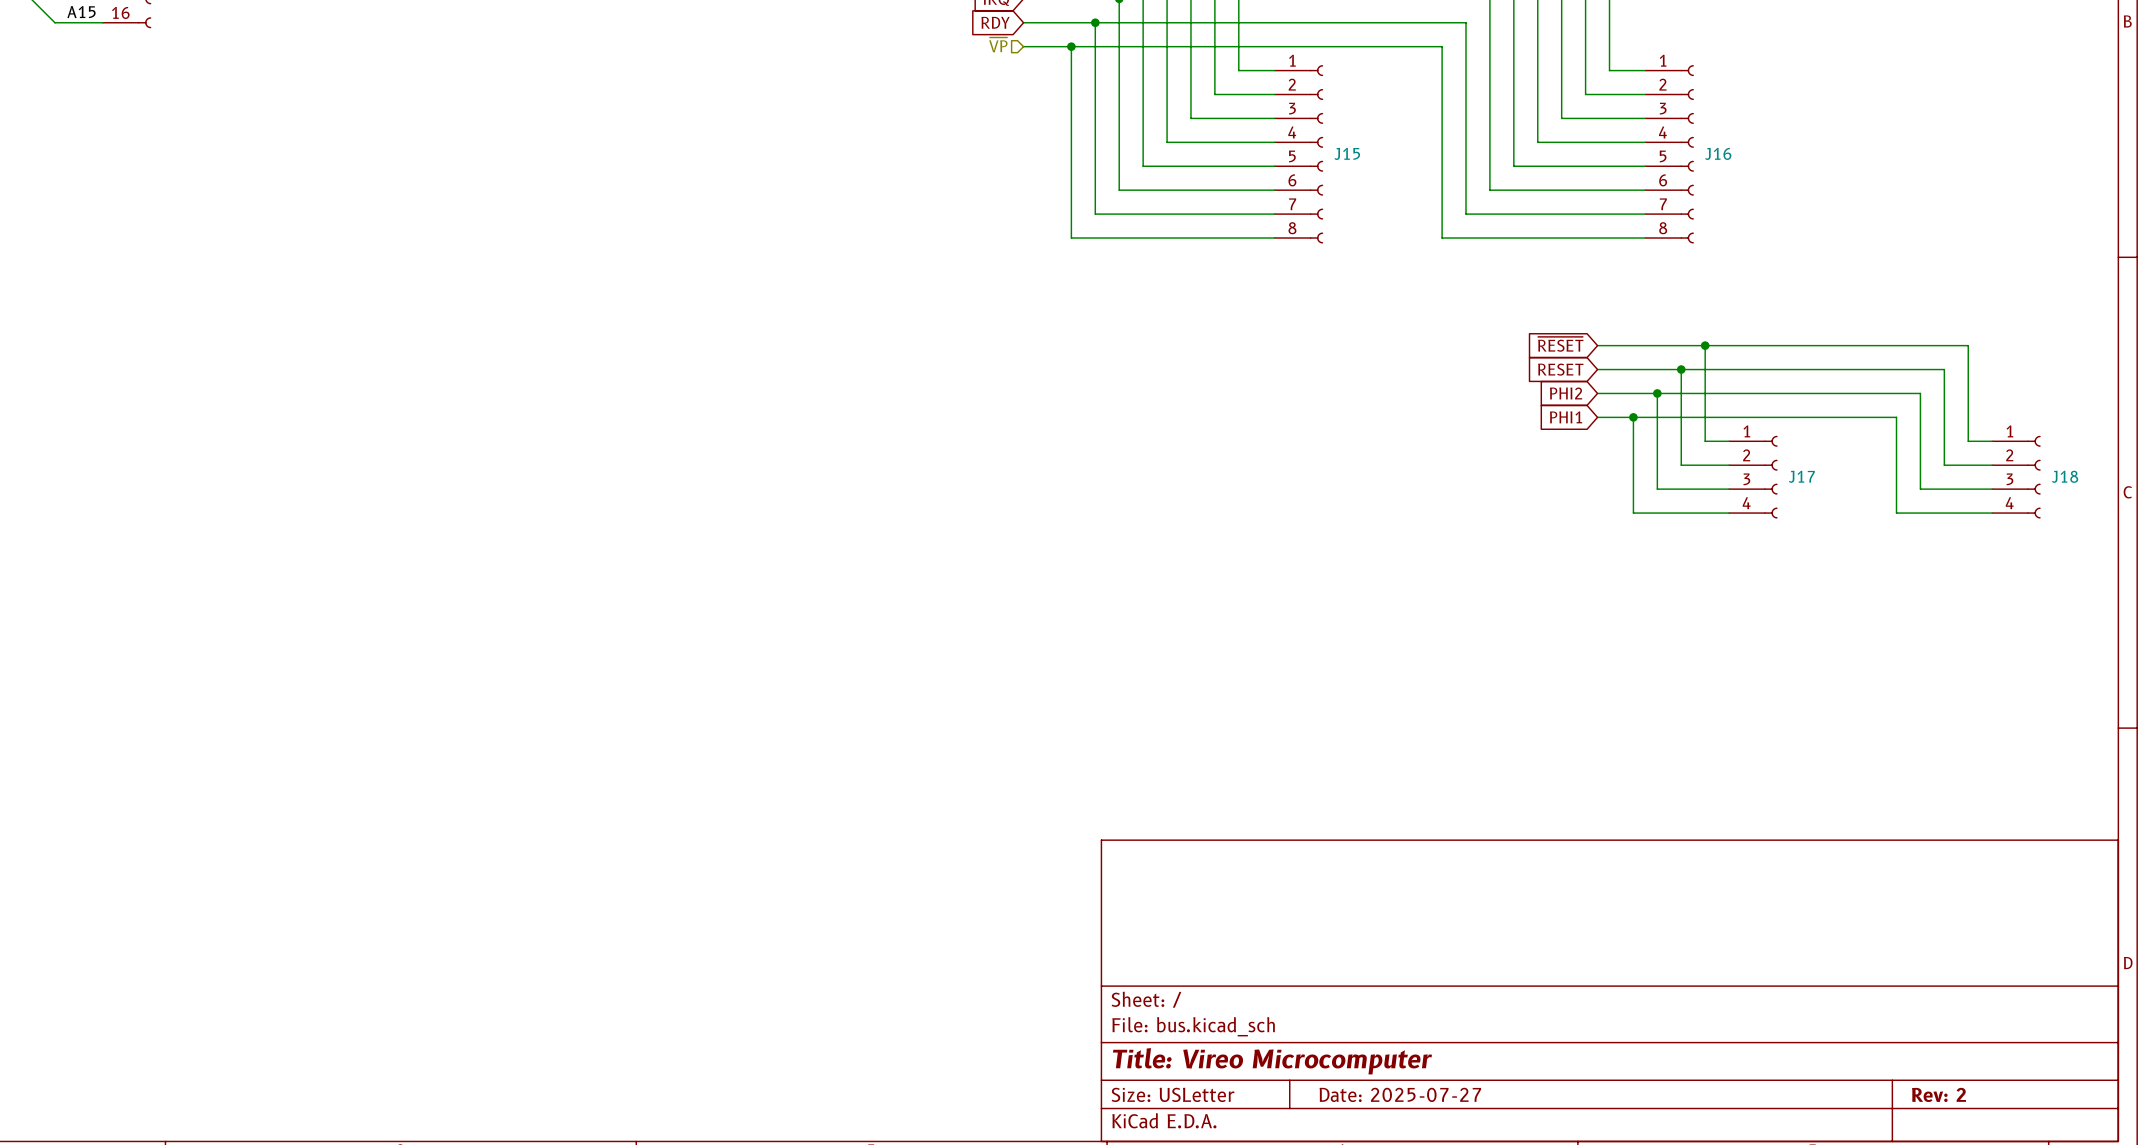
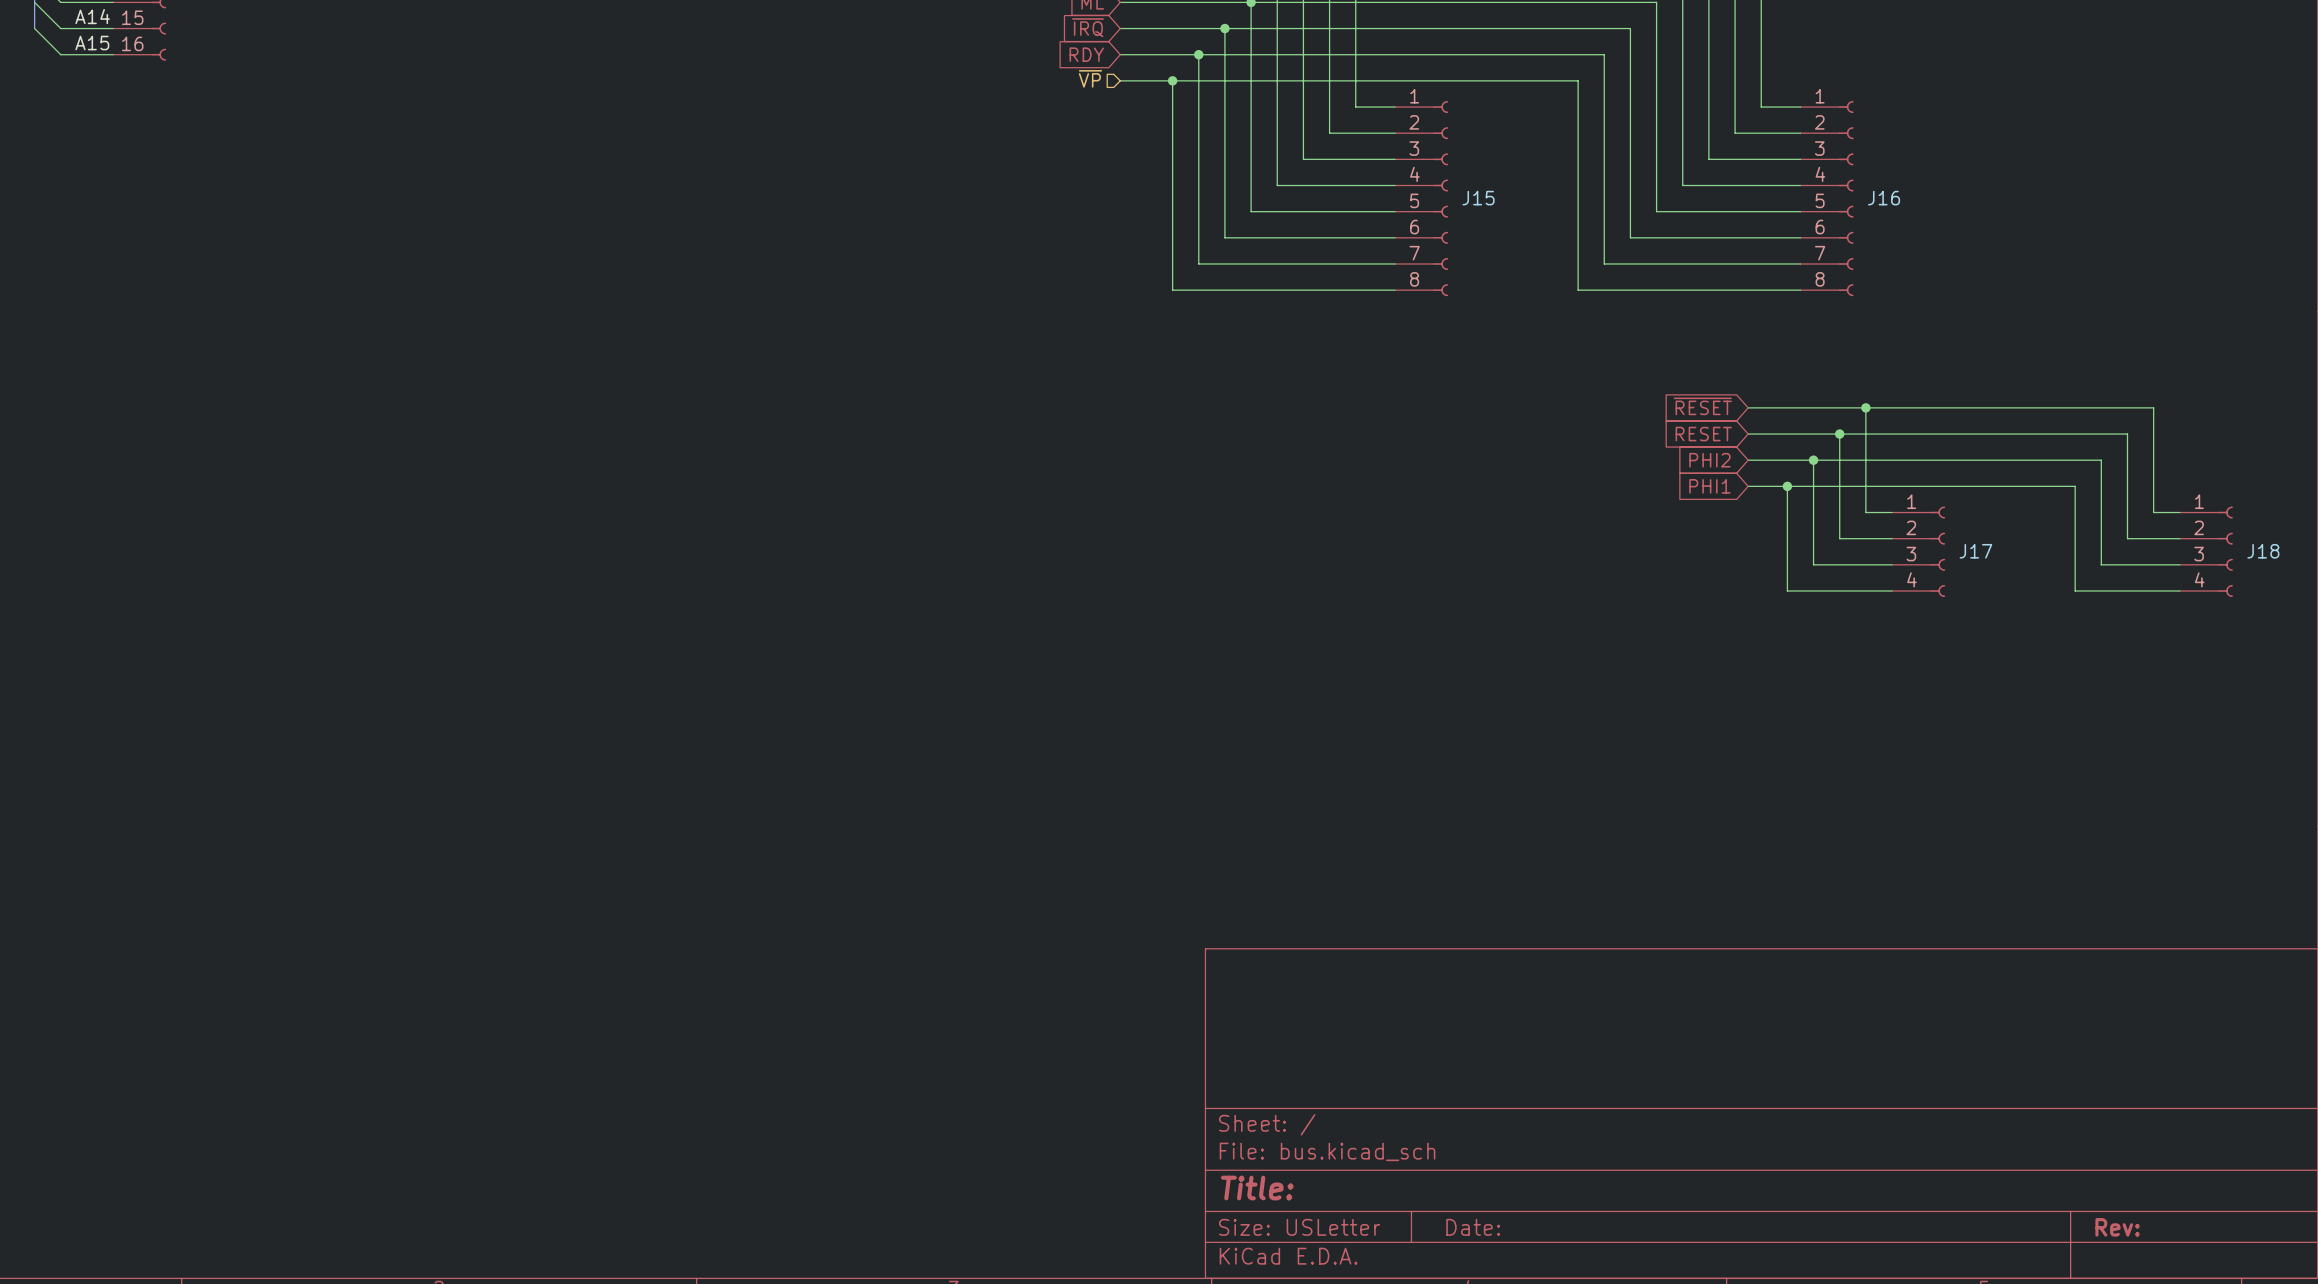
title block: Title: Vireo Microcomputer (1272, 1061) -> Title: (1257, 1188)
title block: Date: 2025-07-27 (1400, 1094) -> Date: (1473, 1227)
title block: Rev: 2 (1938, 1094) -> Rev: (2117, 1227)

